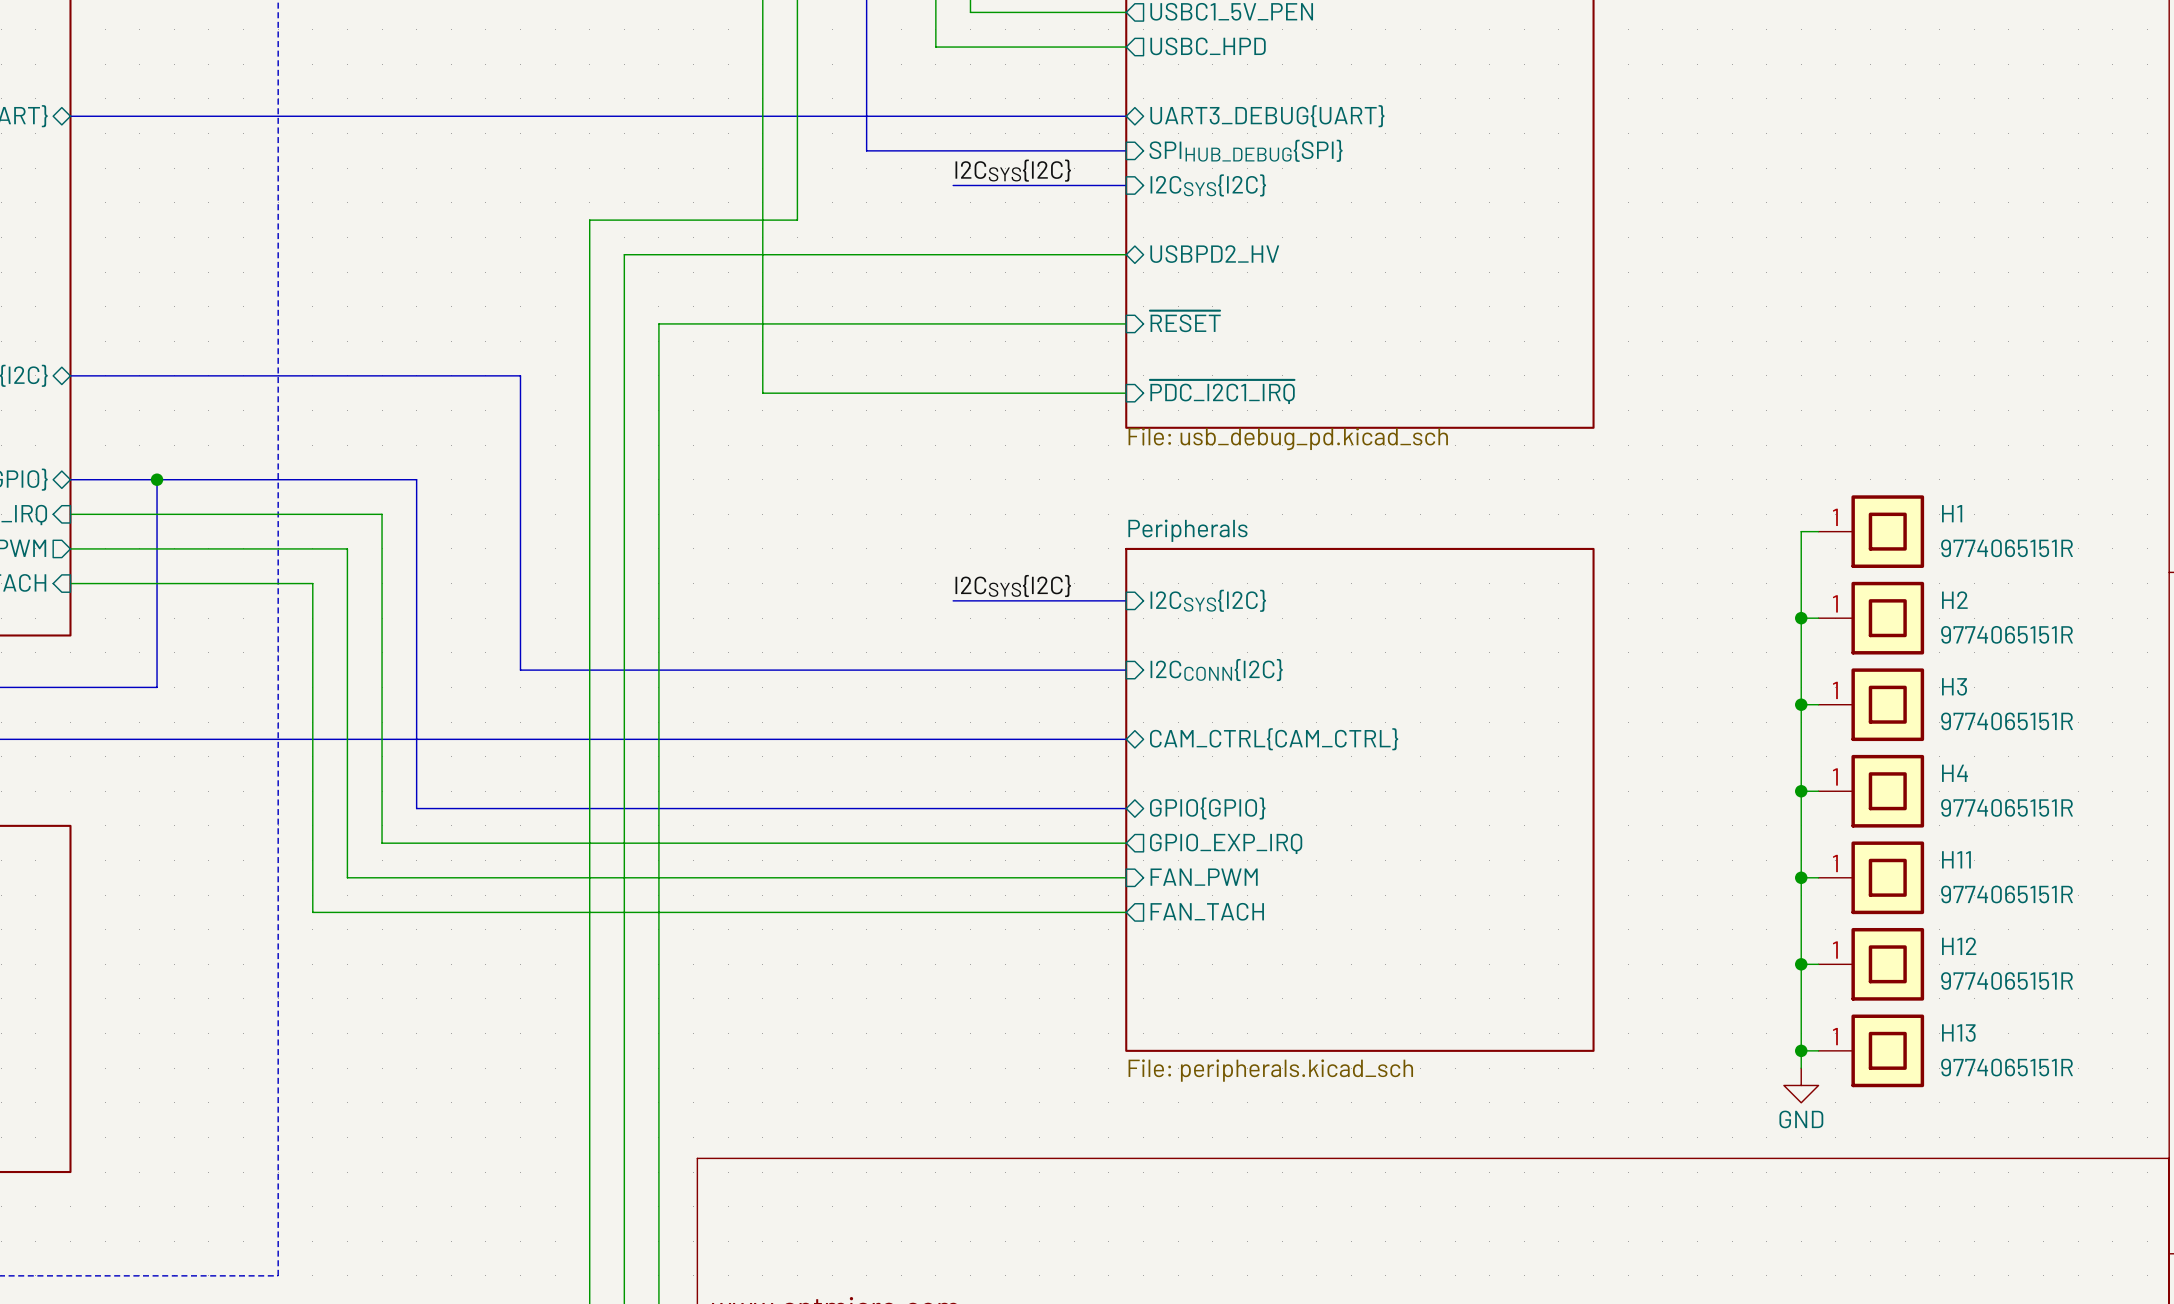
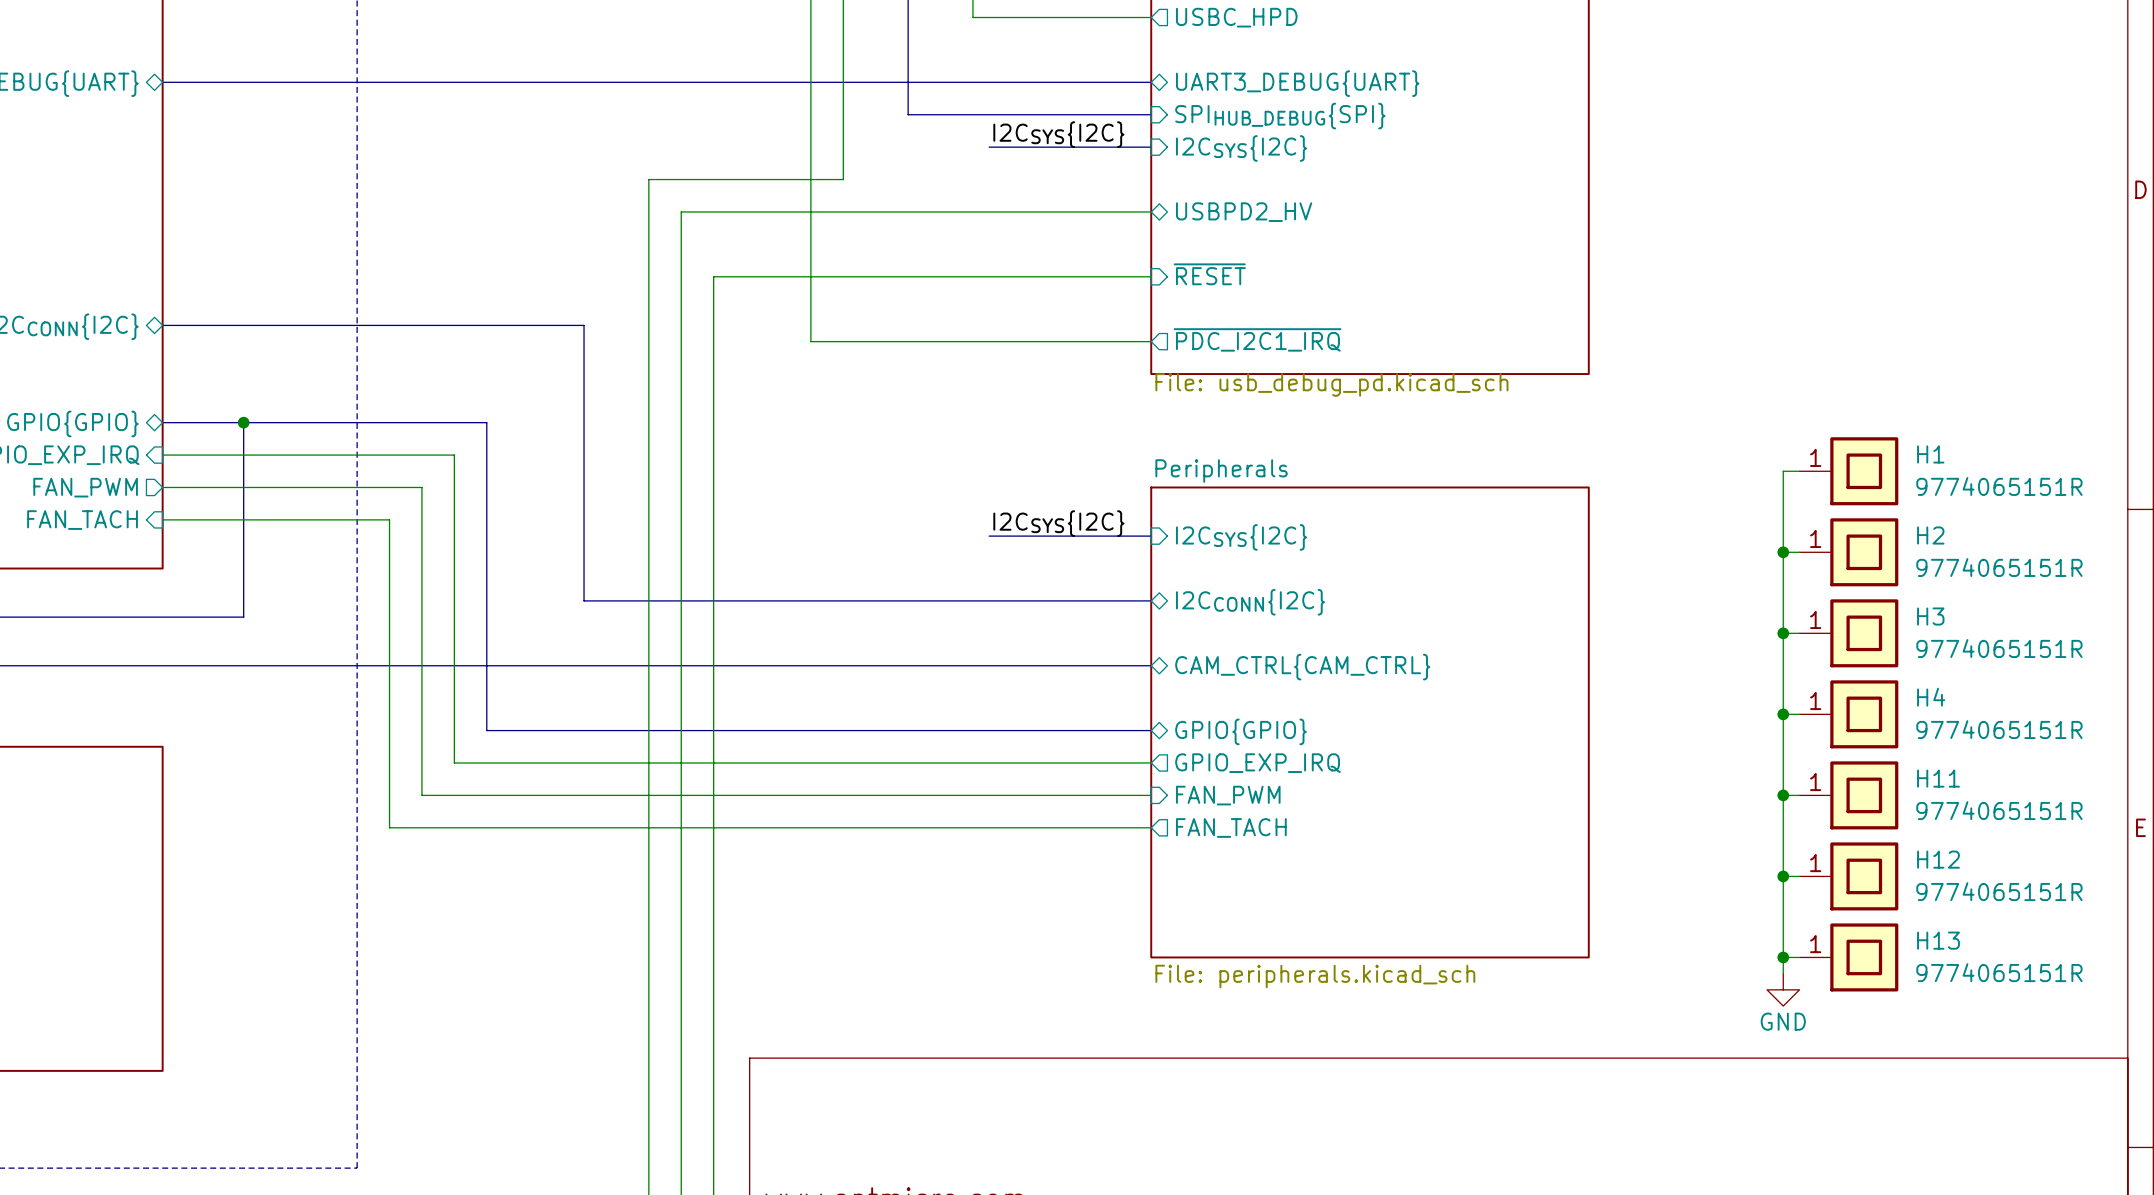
sheet pin shape: input (1222, 391) -> output (1257, 339)
sheet pin shape: input (1216, 670) -> bidirectional (1250, 602)

